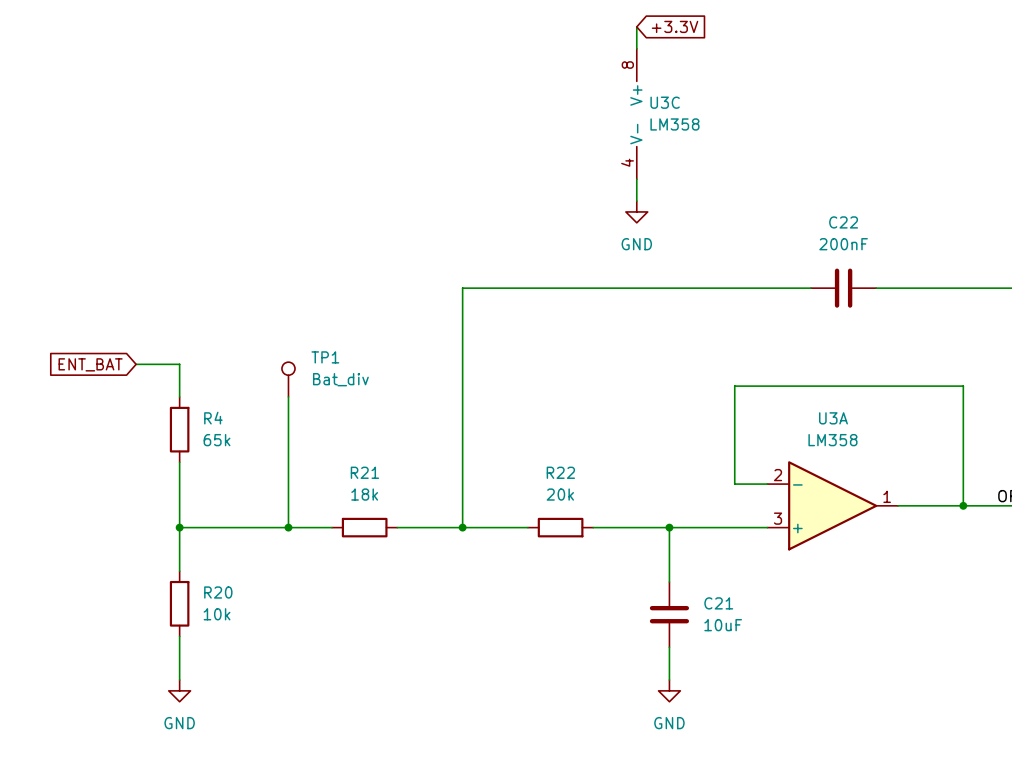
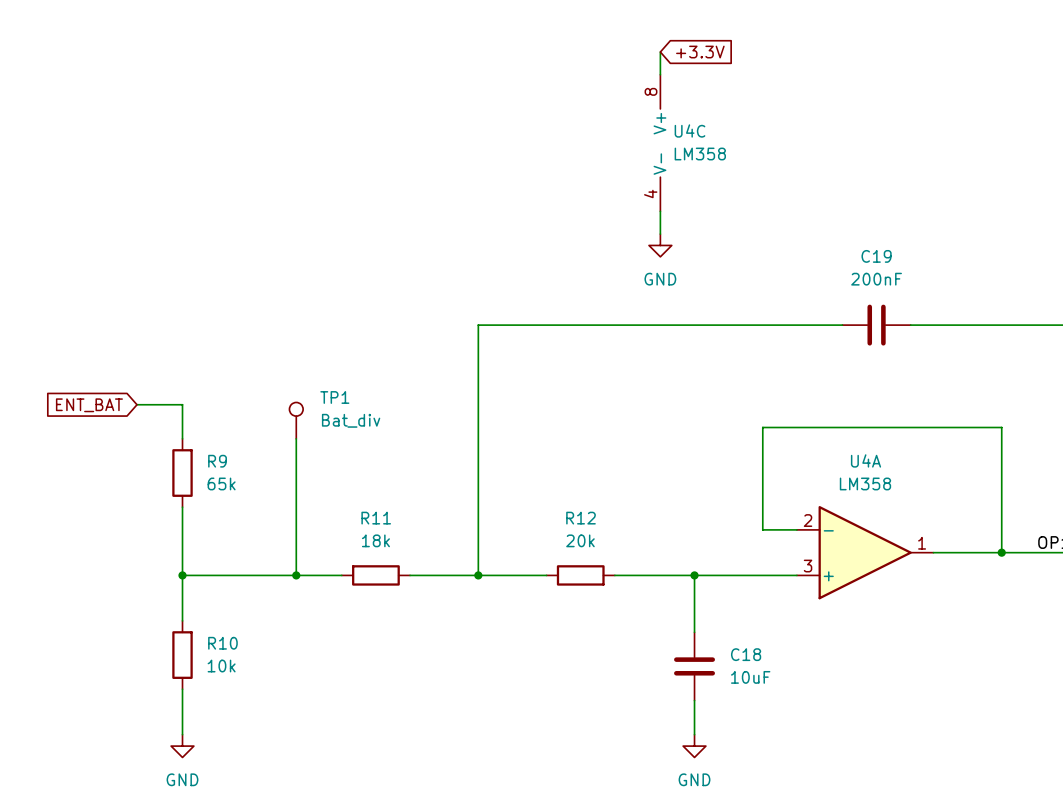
U3C name: U3C (665, 102) -> U4C (690, 130)
C22 name: C22 (843, 222) -> C19 (876, 256)
R4 name: R4 (213, 418) -> R9 (217, 461)
U3A name: U3A (833, 418) -> U4A (866, 460)
R21 name: R21 (364, 472) -> R11 (376, 518)
R22 name: R22 (560, 472) -> R12 (581, 518)
R20 name: R20 (218, 592) -> R10 (222, 643)
C21 name: C21 (718, 603) -> C18 (746, 654)

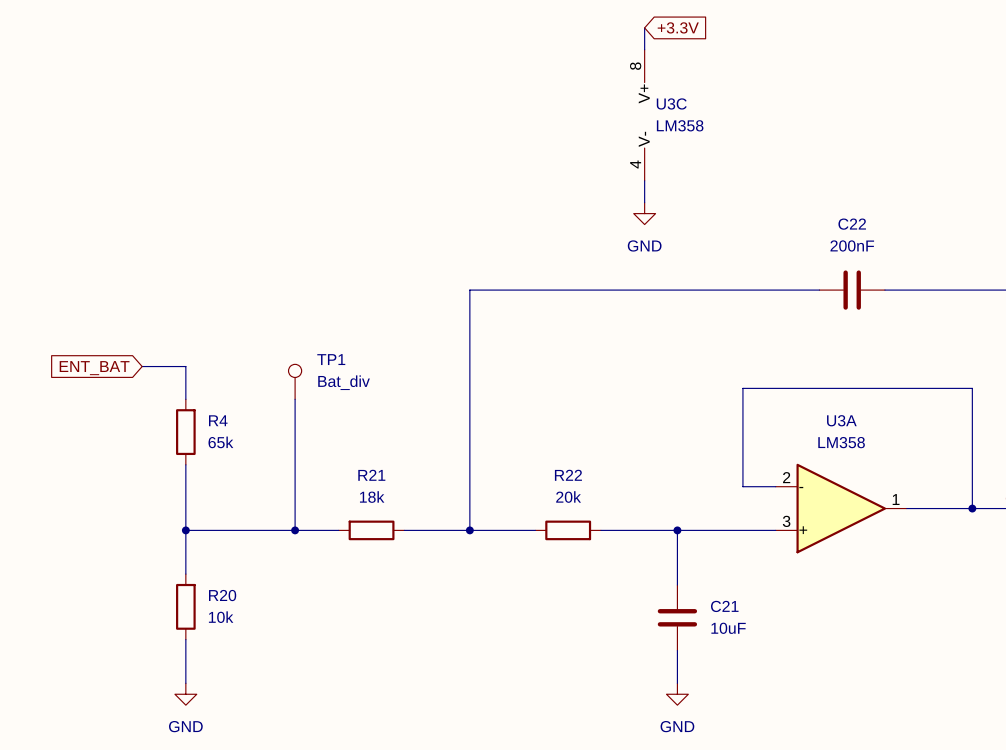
U4C name: U4C (690, 130) -> U3C (671, 103)
C19 name: C19 (876, 256) -> C22 (852, 224)
U4A name: U4A (866, 460) -> U3A (841, 420)
R9 name: R9 (217, 461) -> R4 (218, 420)
R11 name: R11 (376, 518) -> R21 (371, 475)
R12 name: R12 (581, 518) -> R22 (568, 475)
R10 name: R10 (222, 643) -> R20 (222, 595)
C18 name: C18 (746, 654) -> C21 (724, 606)

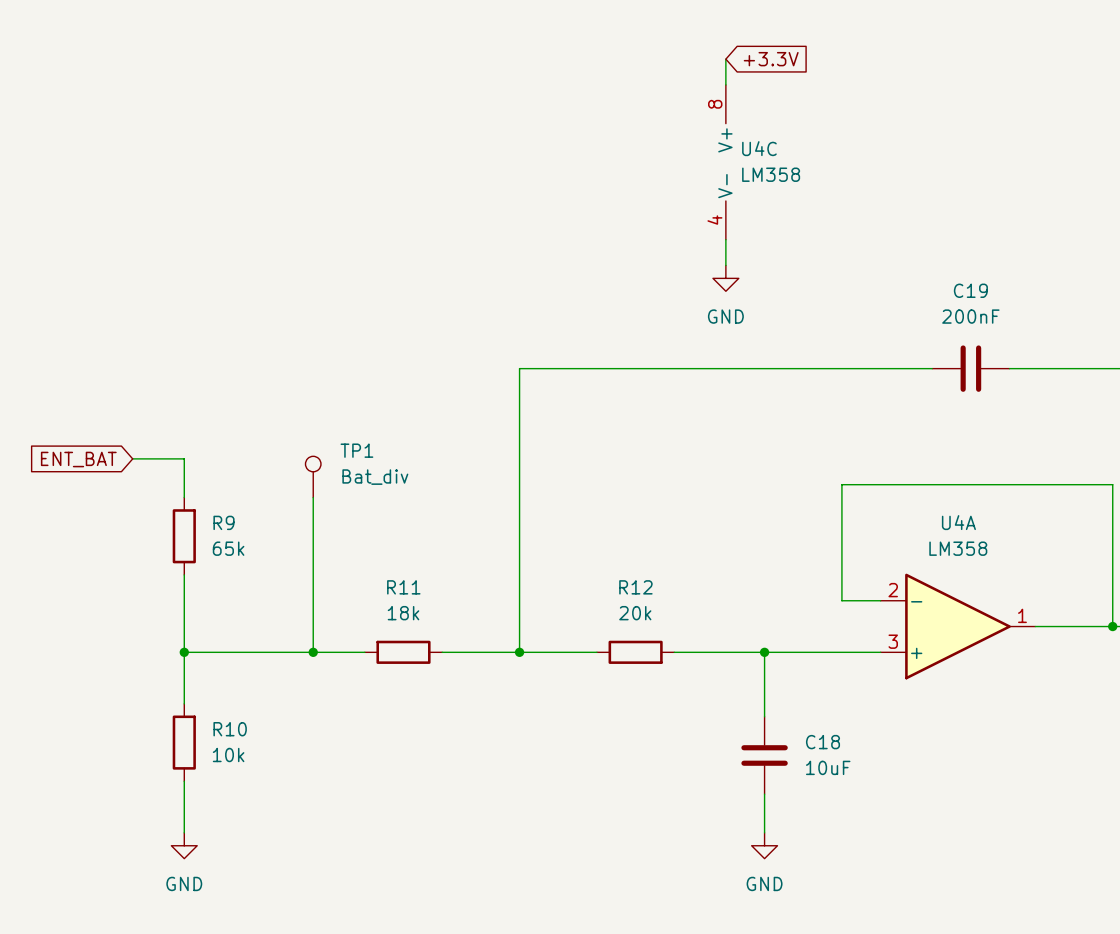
U3C name: U3C (671, 103) -> U4C (759, 148)
C22 name: C22 (852, 224) -> C19 (970, 290)
R4 name: R4 (218, 420) -> R9 (223, 522)
U3A name: U3A (841, 420) -> U4A (958, 522)
R21 name: R21 (371, 475) -> R11 (403, 587)
R22 name: R22 (568, 475) -> R12 (635, 587)
R20 name: R20 (222, 595) -> R10 (230, 729)
C21 name: C21 (724, 606) -> C18 (823, 742)

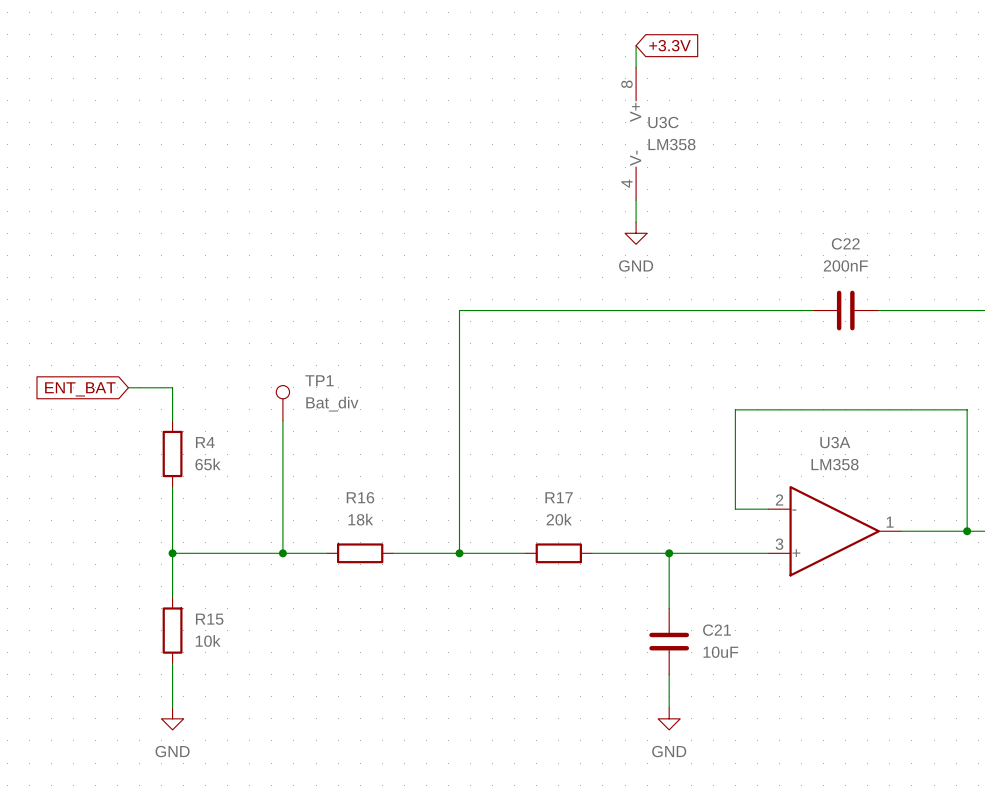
U4C name: U4C (759, 148) -> U3C (663, 122)
C19 name: C19 (970, 290) -> C22 (845, 243)
R9 name: R9 (223, 522) -> R4 (205, 442)
U4A name: U4A (958, 522) -> U3A (835, 442)
R11 name: R11 (403, 587) -> R16 (360, 497)
R12 name: R12 (635, 587) -> R17 (559, 497)
R10 name: R10 (230, 729) -> R15 (209, 619)
C18 name: C18 (823, 742) -> C21 (717, 630)

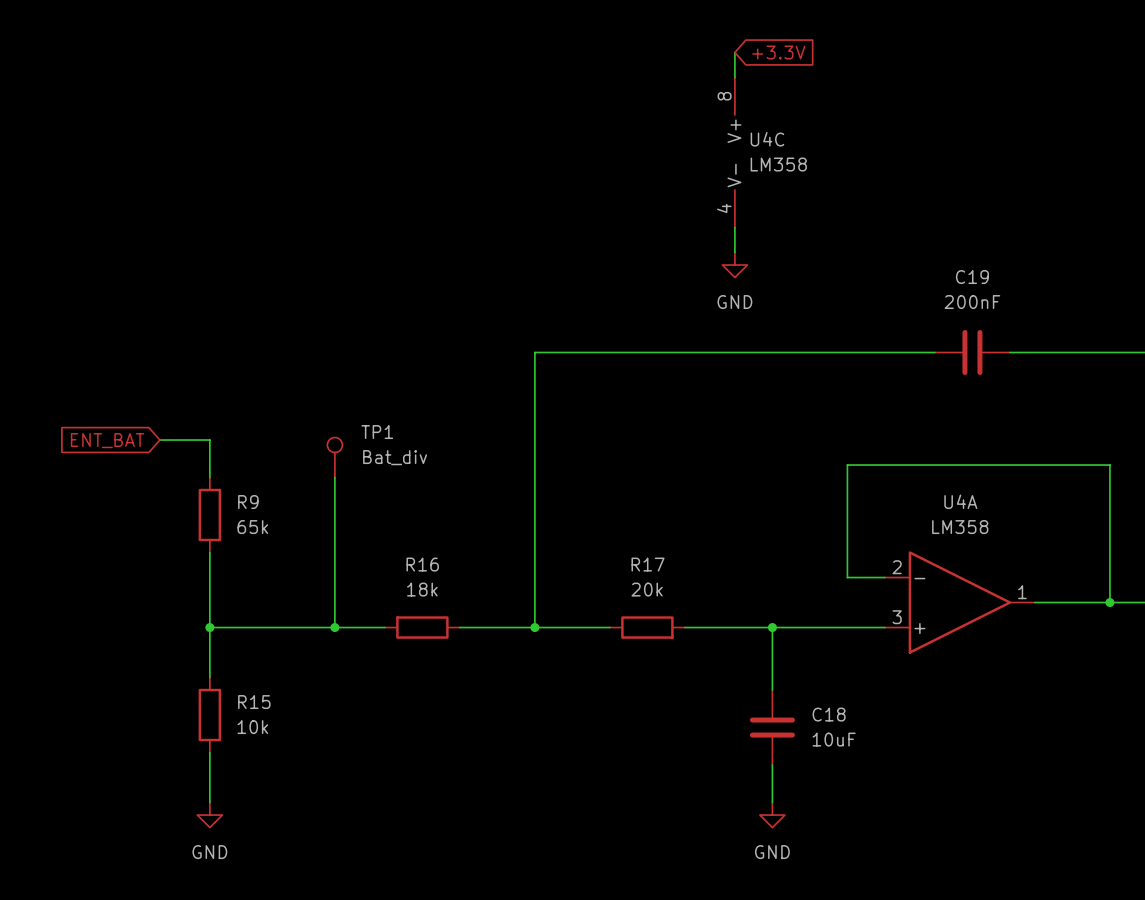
U3C name: U3C (663, 122) -> U4C (767, 139)
C22 name: C22 (845, 243) -> C19 (972, 277)
R4 name: R4 (205, 442) -> R9 (248, 502)
U3A name: U3A (835, 442) -> U4A (960, 501)
C21 name: C21 (717, 630) -> C18 (829, 714)

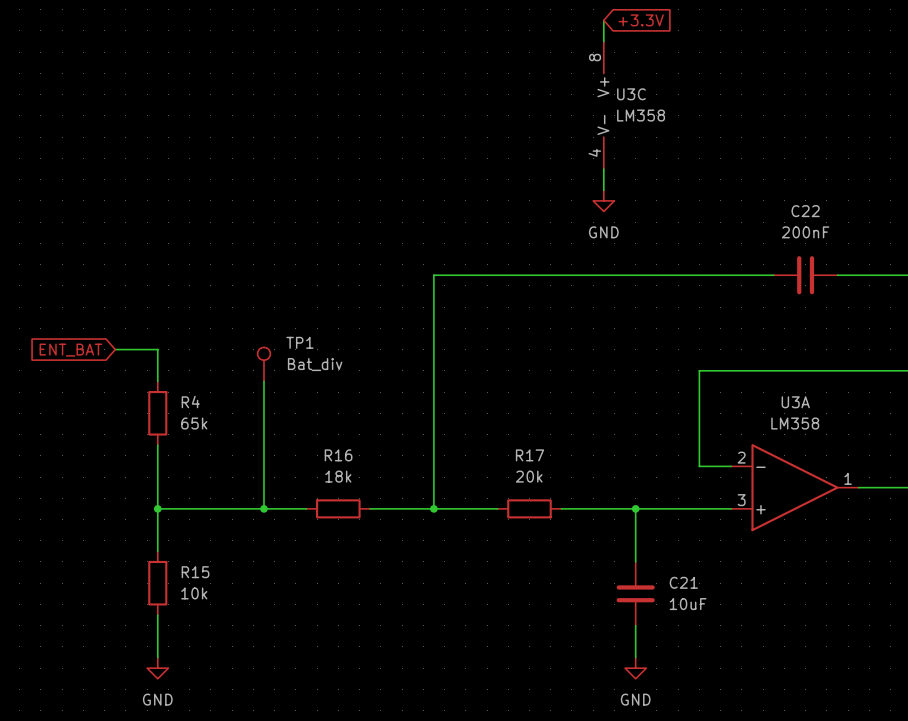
U4C name: U4C (767, 139) -> U3C (631, 94)
C19 name: C19 (972, 277) -> C22 (805, 211)
U4A name: U4A (960, 501) -> U3A (795, 402)
R9 name: R9 (248, 502) -> R4 (190, 402)
C18 name: C18 (829, 714) -> C21 (683, 582)

